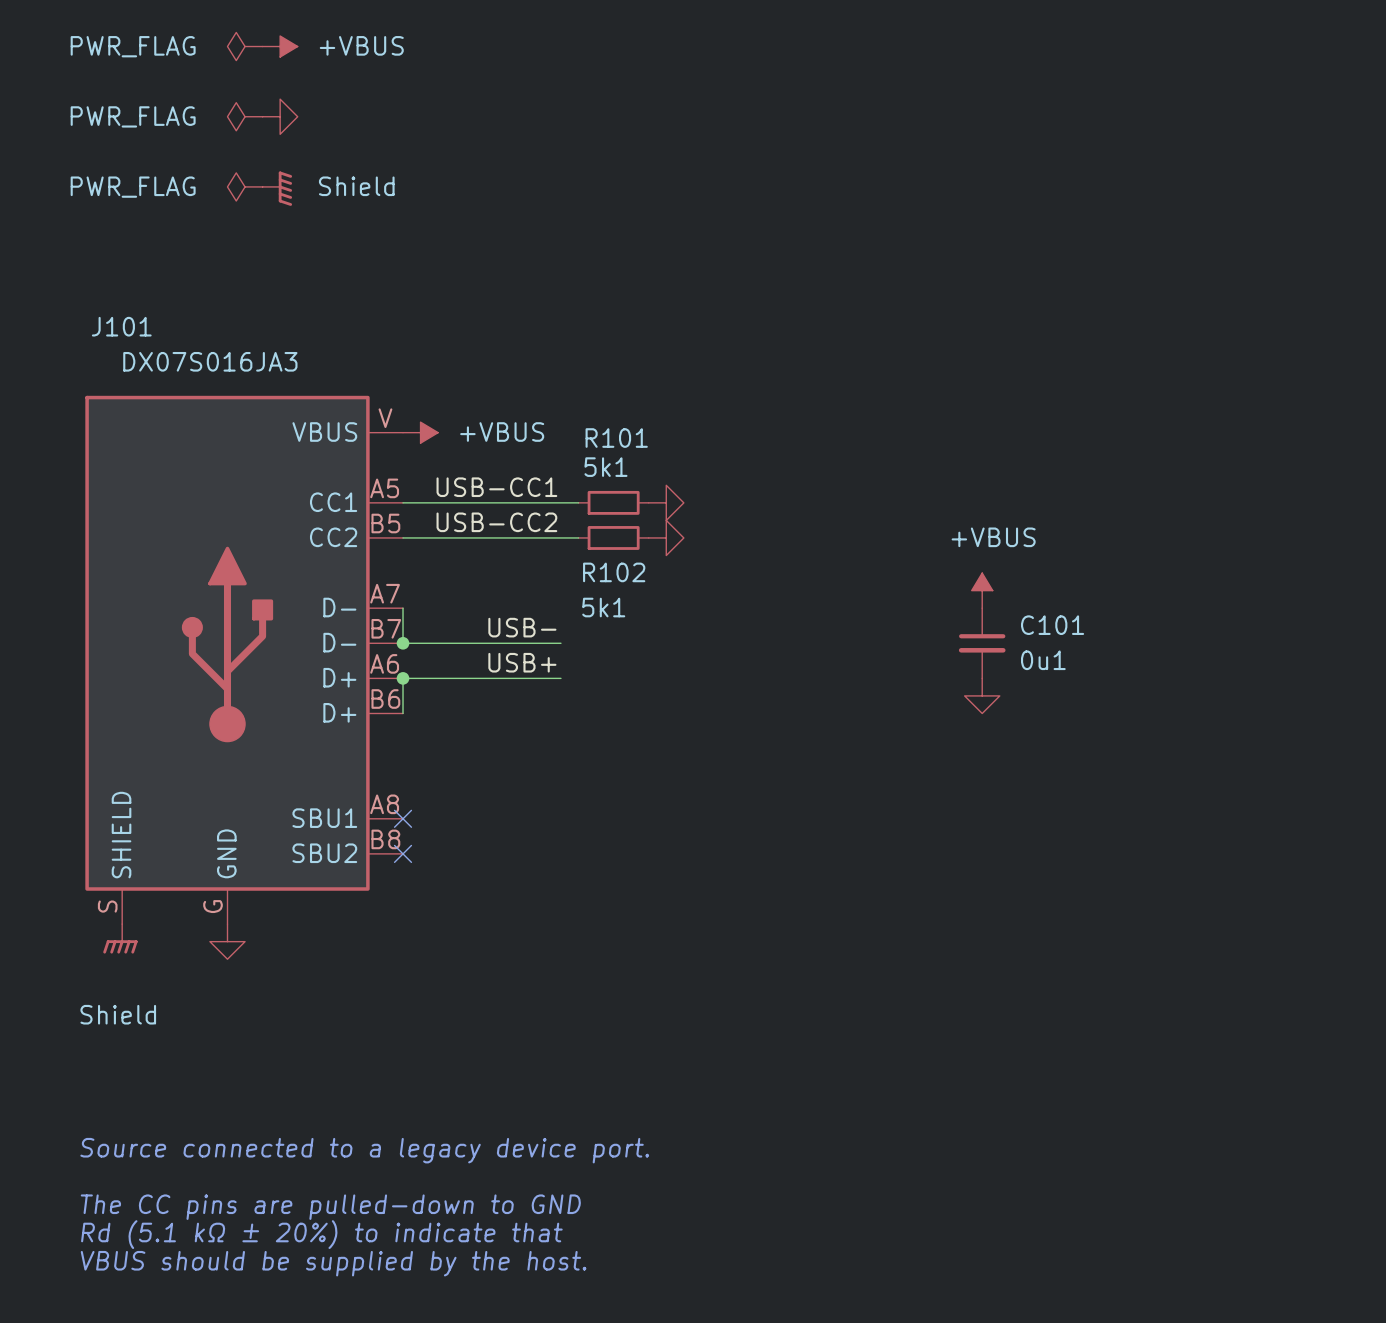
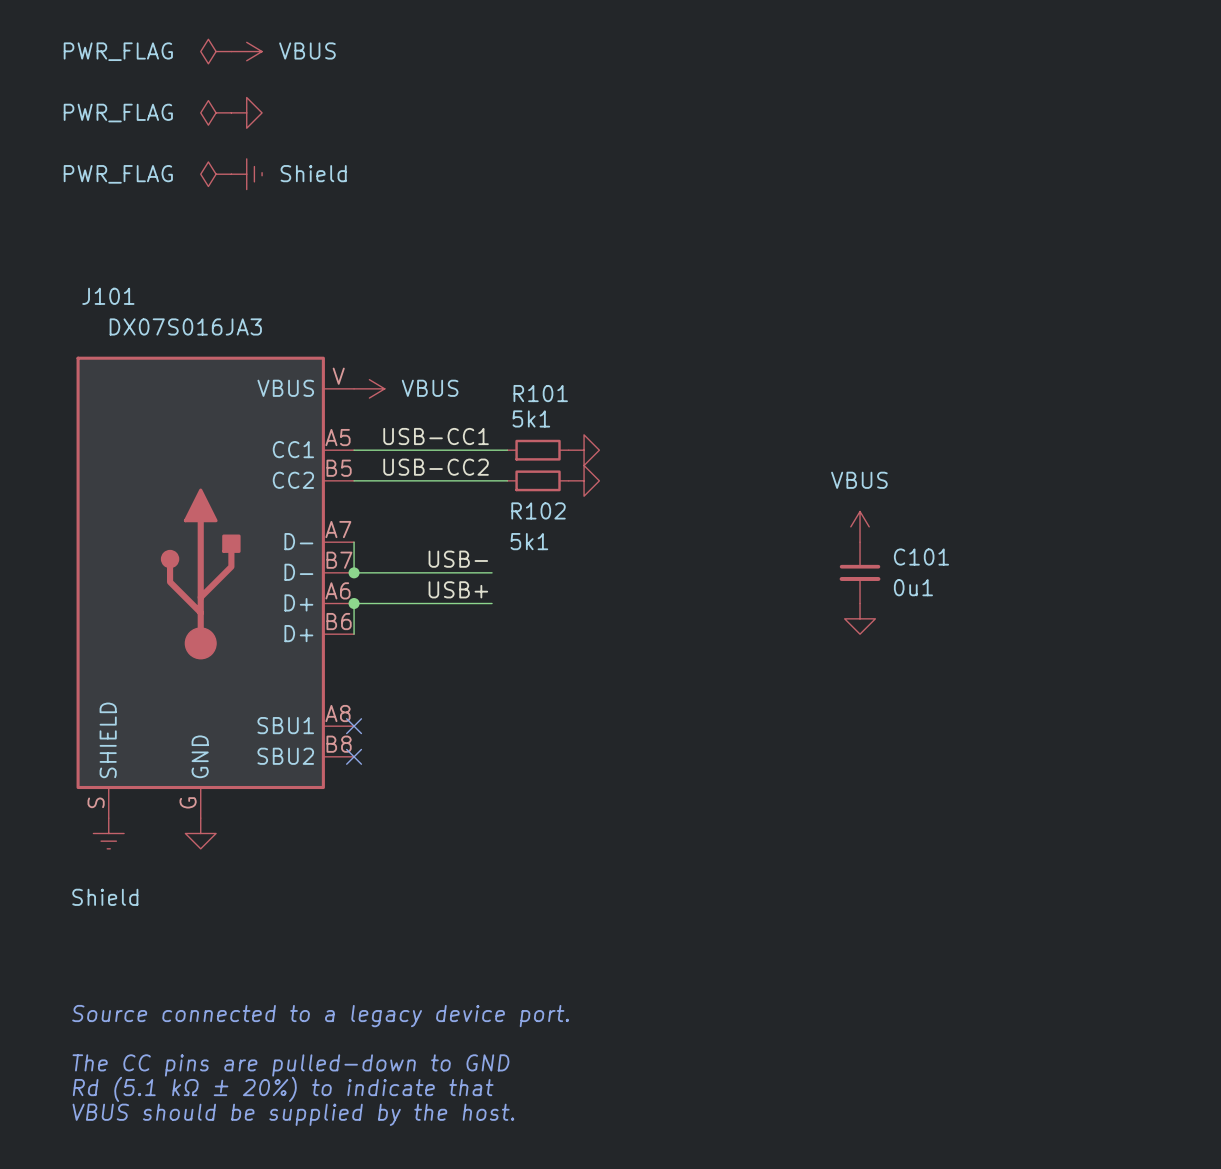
power symbol: +VBUS (280, 46) -> VBUS (246, 51)
power symbol shape: [262, 171, 293, 206] -> [231, 158, 263, 190]
power symbol: +VBUS (420, 432) -> VBUS (369, 388)
power symbol: +VBUS (982, 590) -> VBUS (860, 526)
power symbol shape: [103, 924, 138, 954] -> [93, 818, 125, 849]

